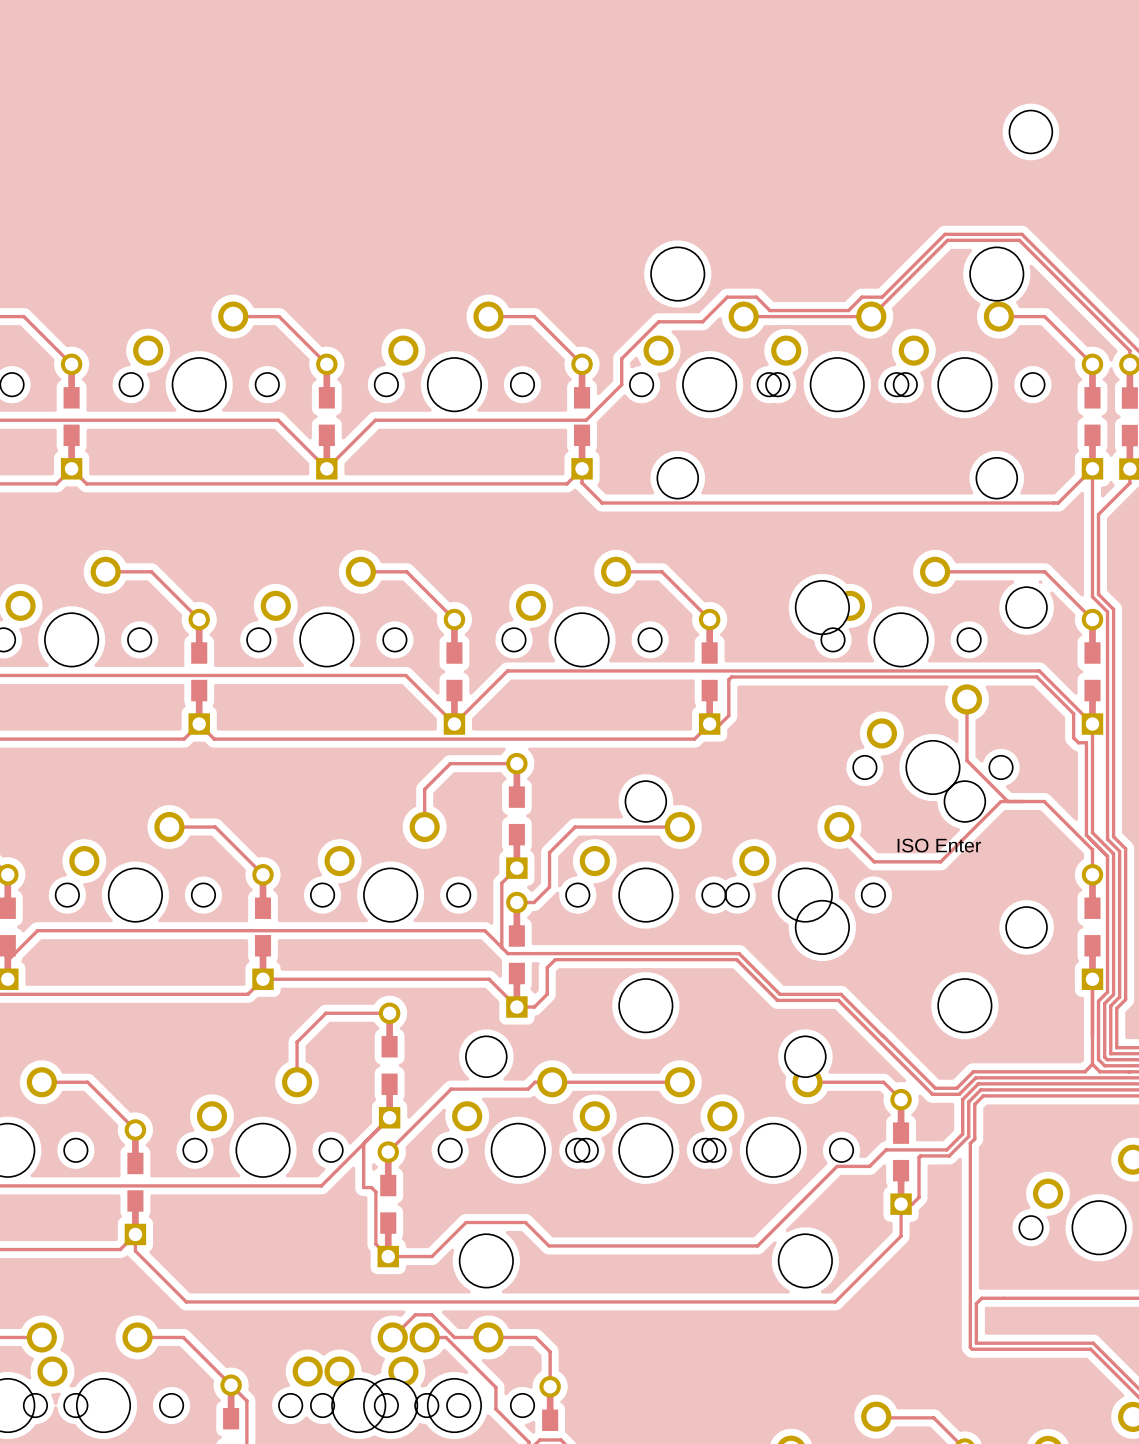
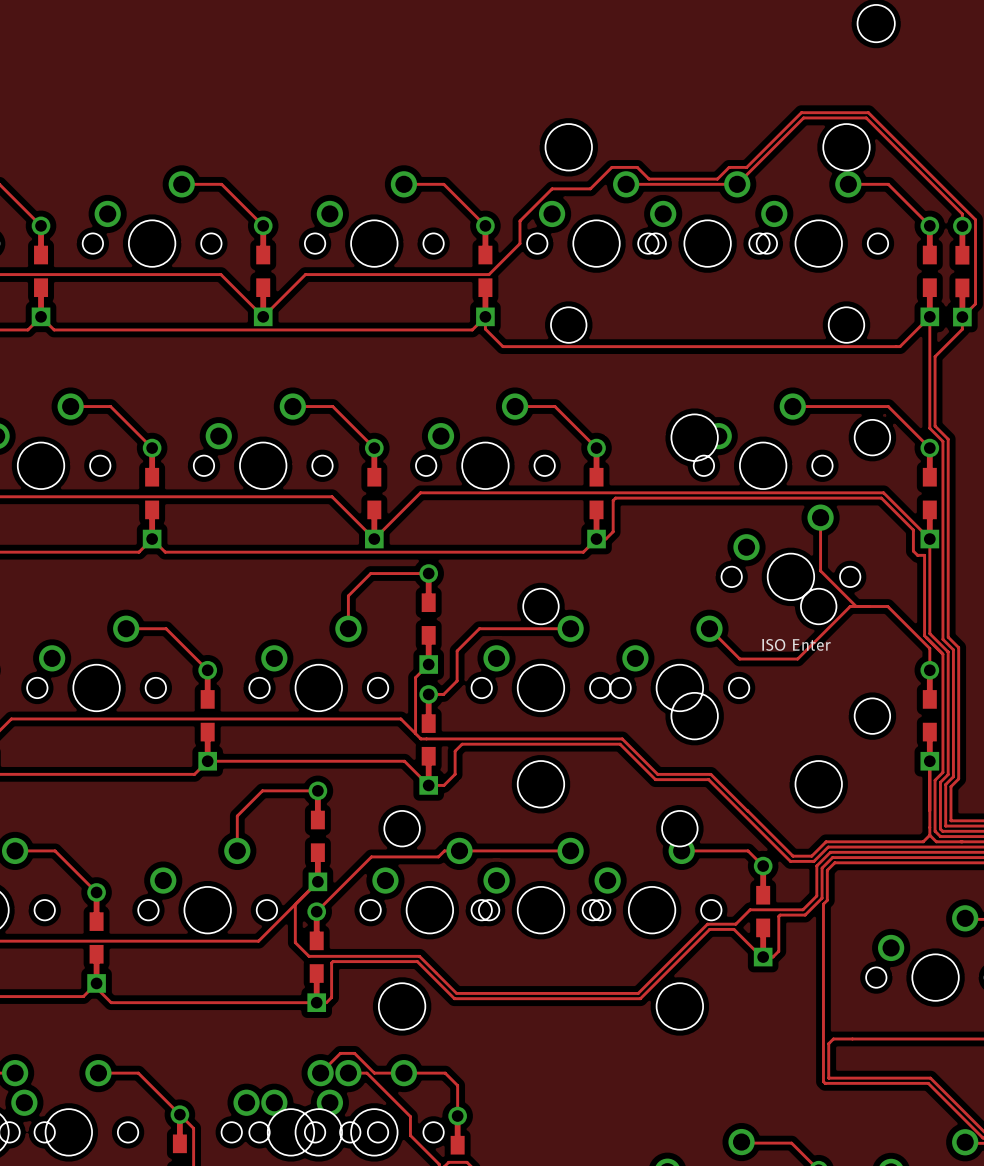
track: (363, 1187) (371, 1187) (375, 1191) (375, 1244) (388, 1256) -> (96, 988) (111, 1002) (316, 1002)
track: (901, 1204) (901, 1236) (835, 1301) (186, 1301) (135, 1251) (135, 1234) -> (763, 957) (734, 929) (709, 929) (640, 998) (454, 998) (417, 961) (333, 961) (331, 997) (326, 1002)
track: (525, 1222) (466, 1222) (432, 1256) (399, 1256) -> (436, 973) (419, 956) (309, 956) (295, 942)

